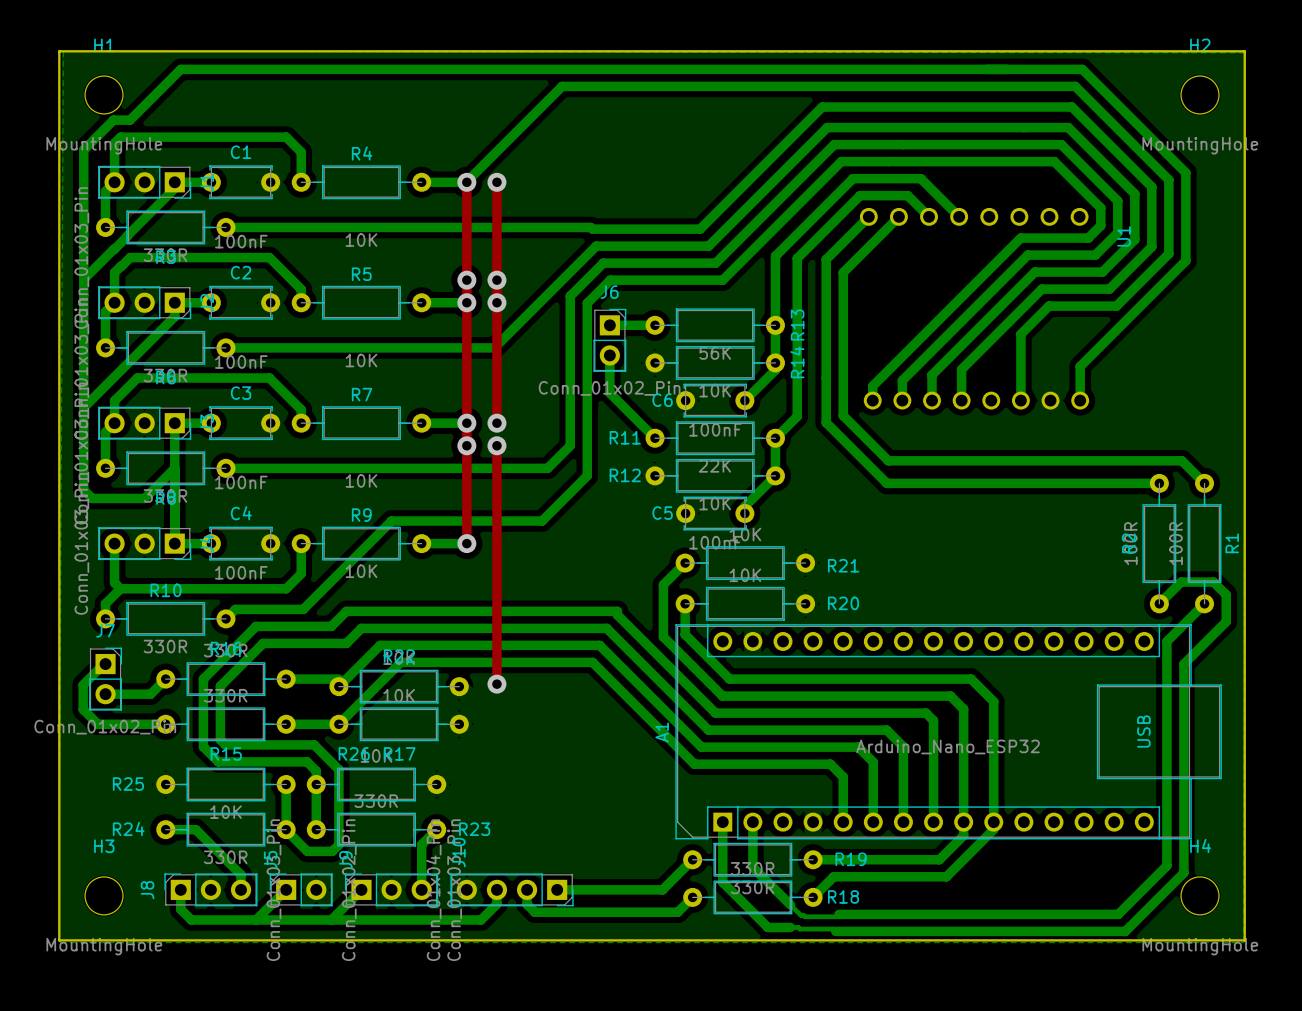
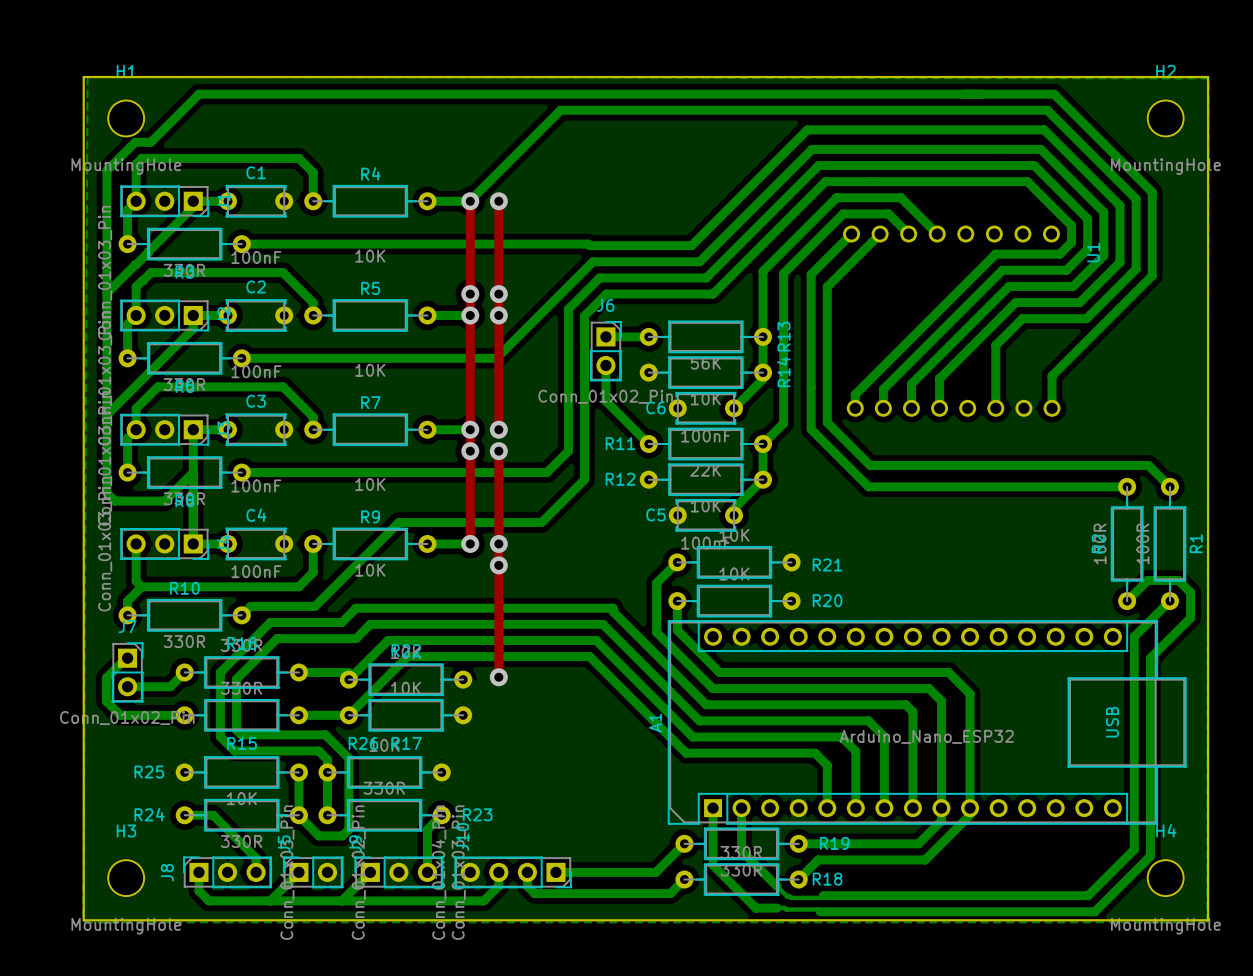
via: none -> (498, 543)
via: none -> (498, 565)

